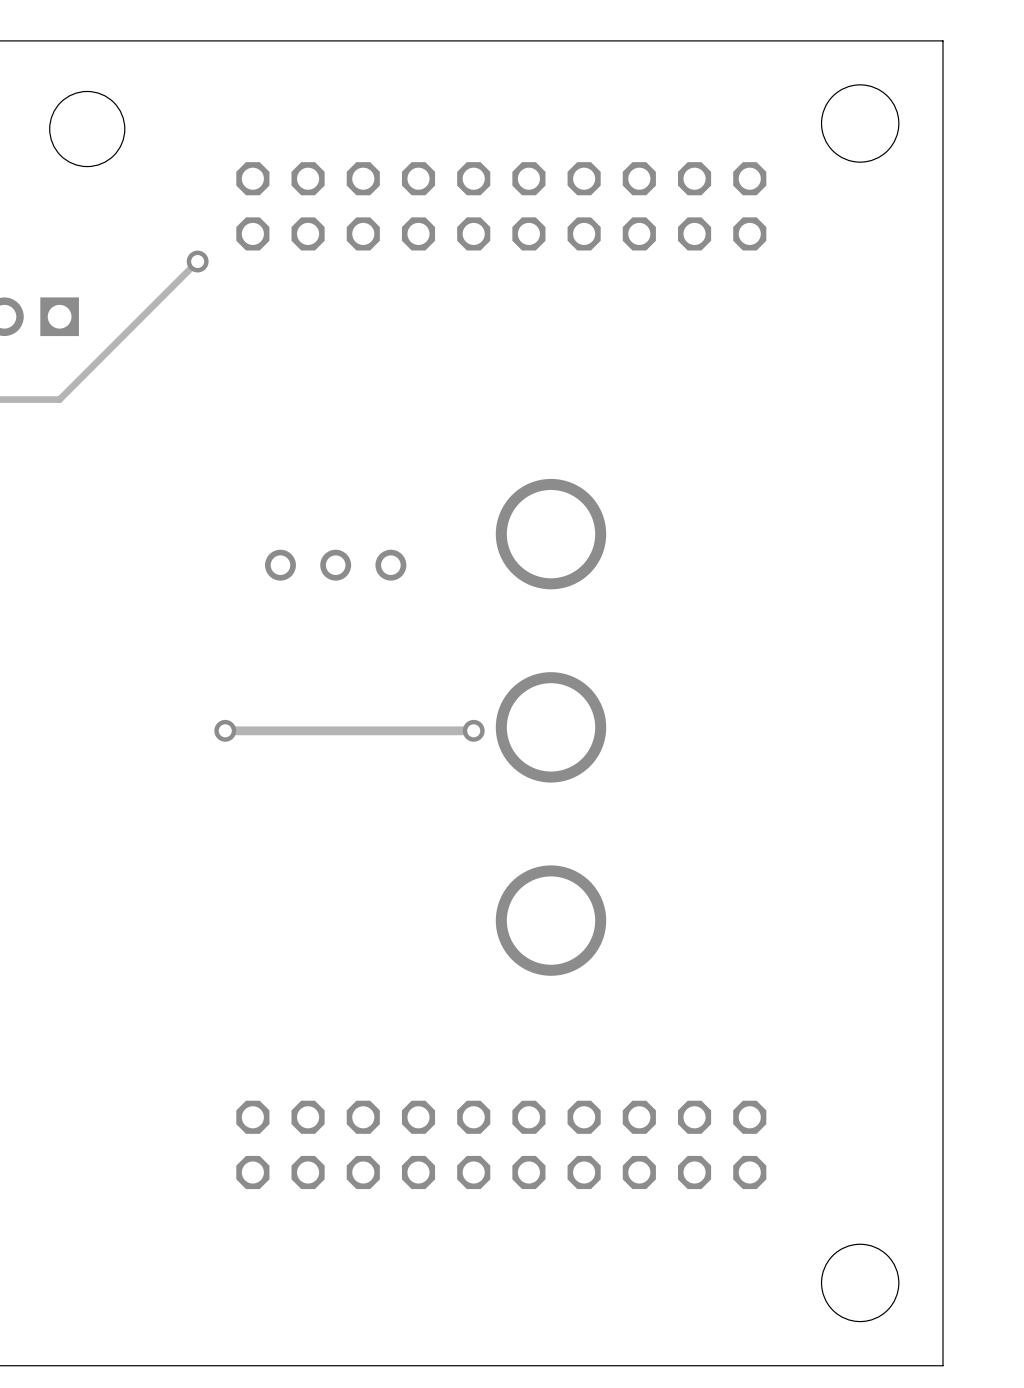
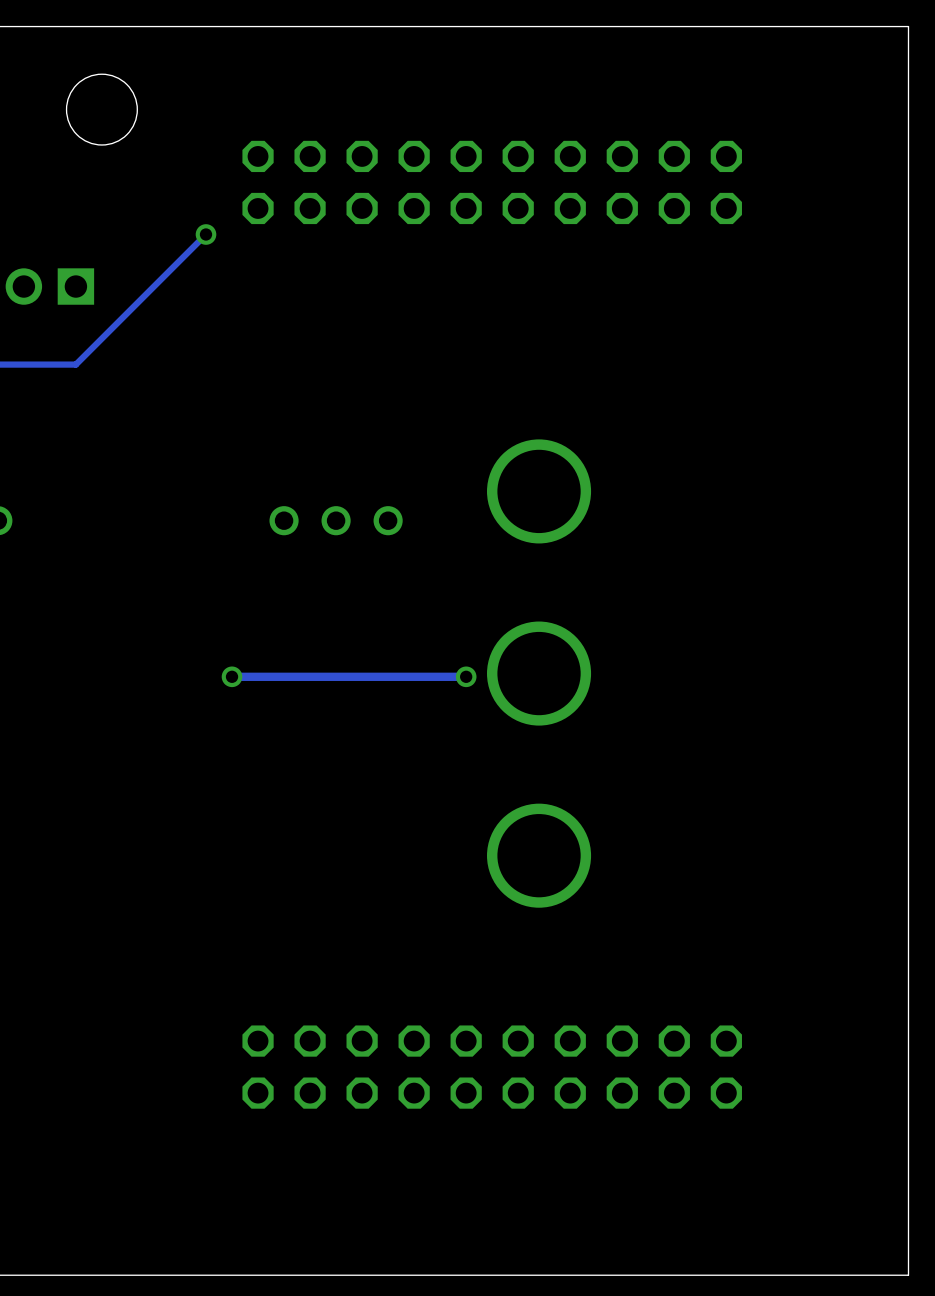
drawing: [821, 84, 900, 163] -> none
drawing: [821, 1243, 900, 1322] -> none

